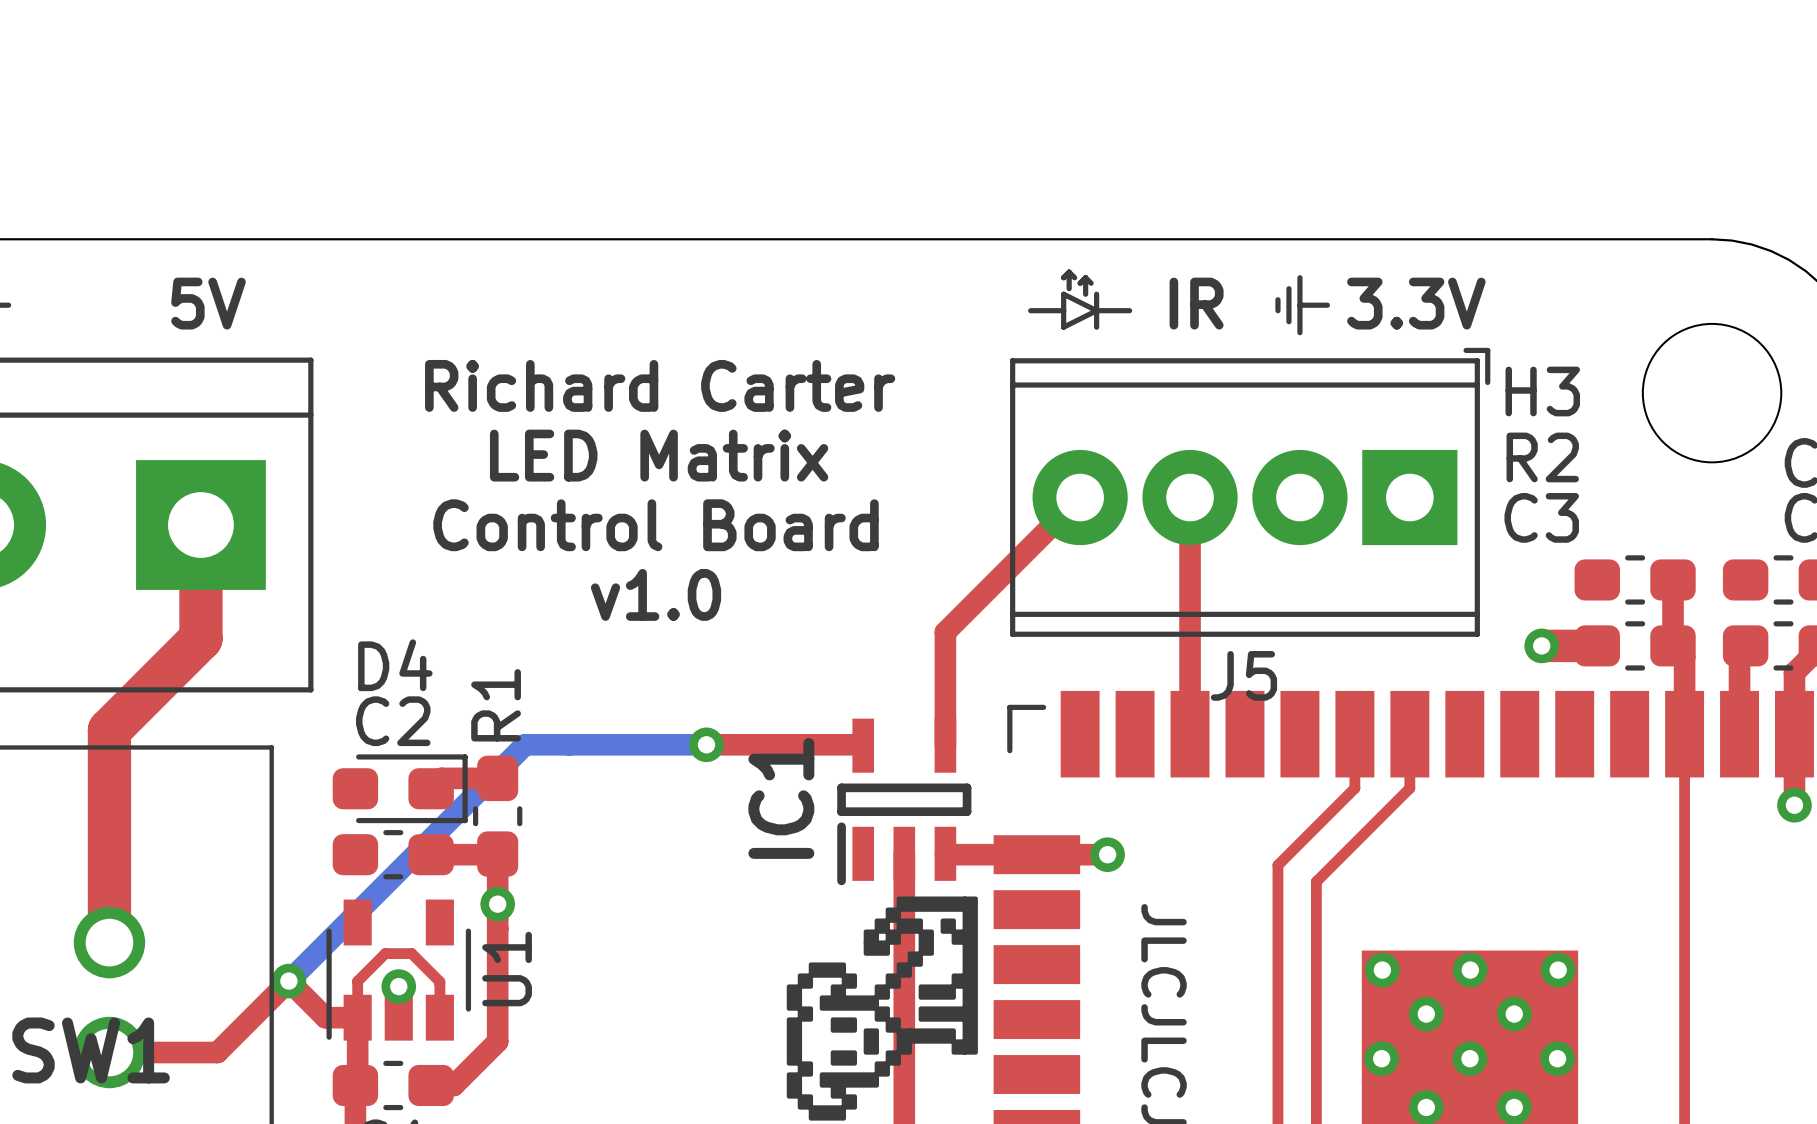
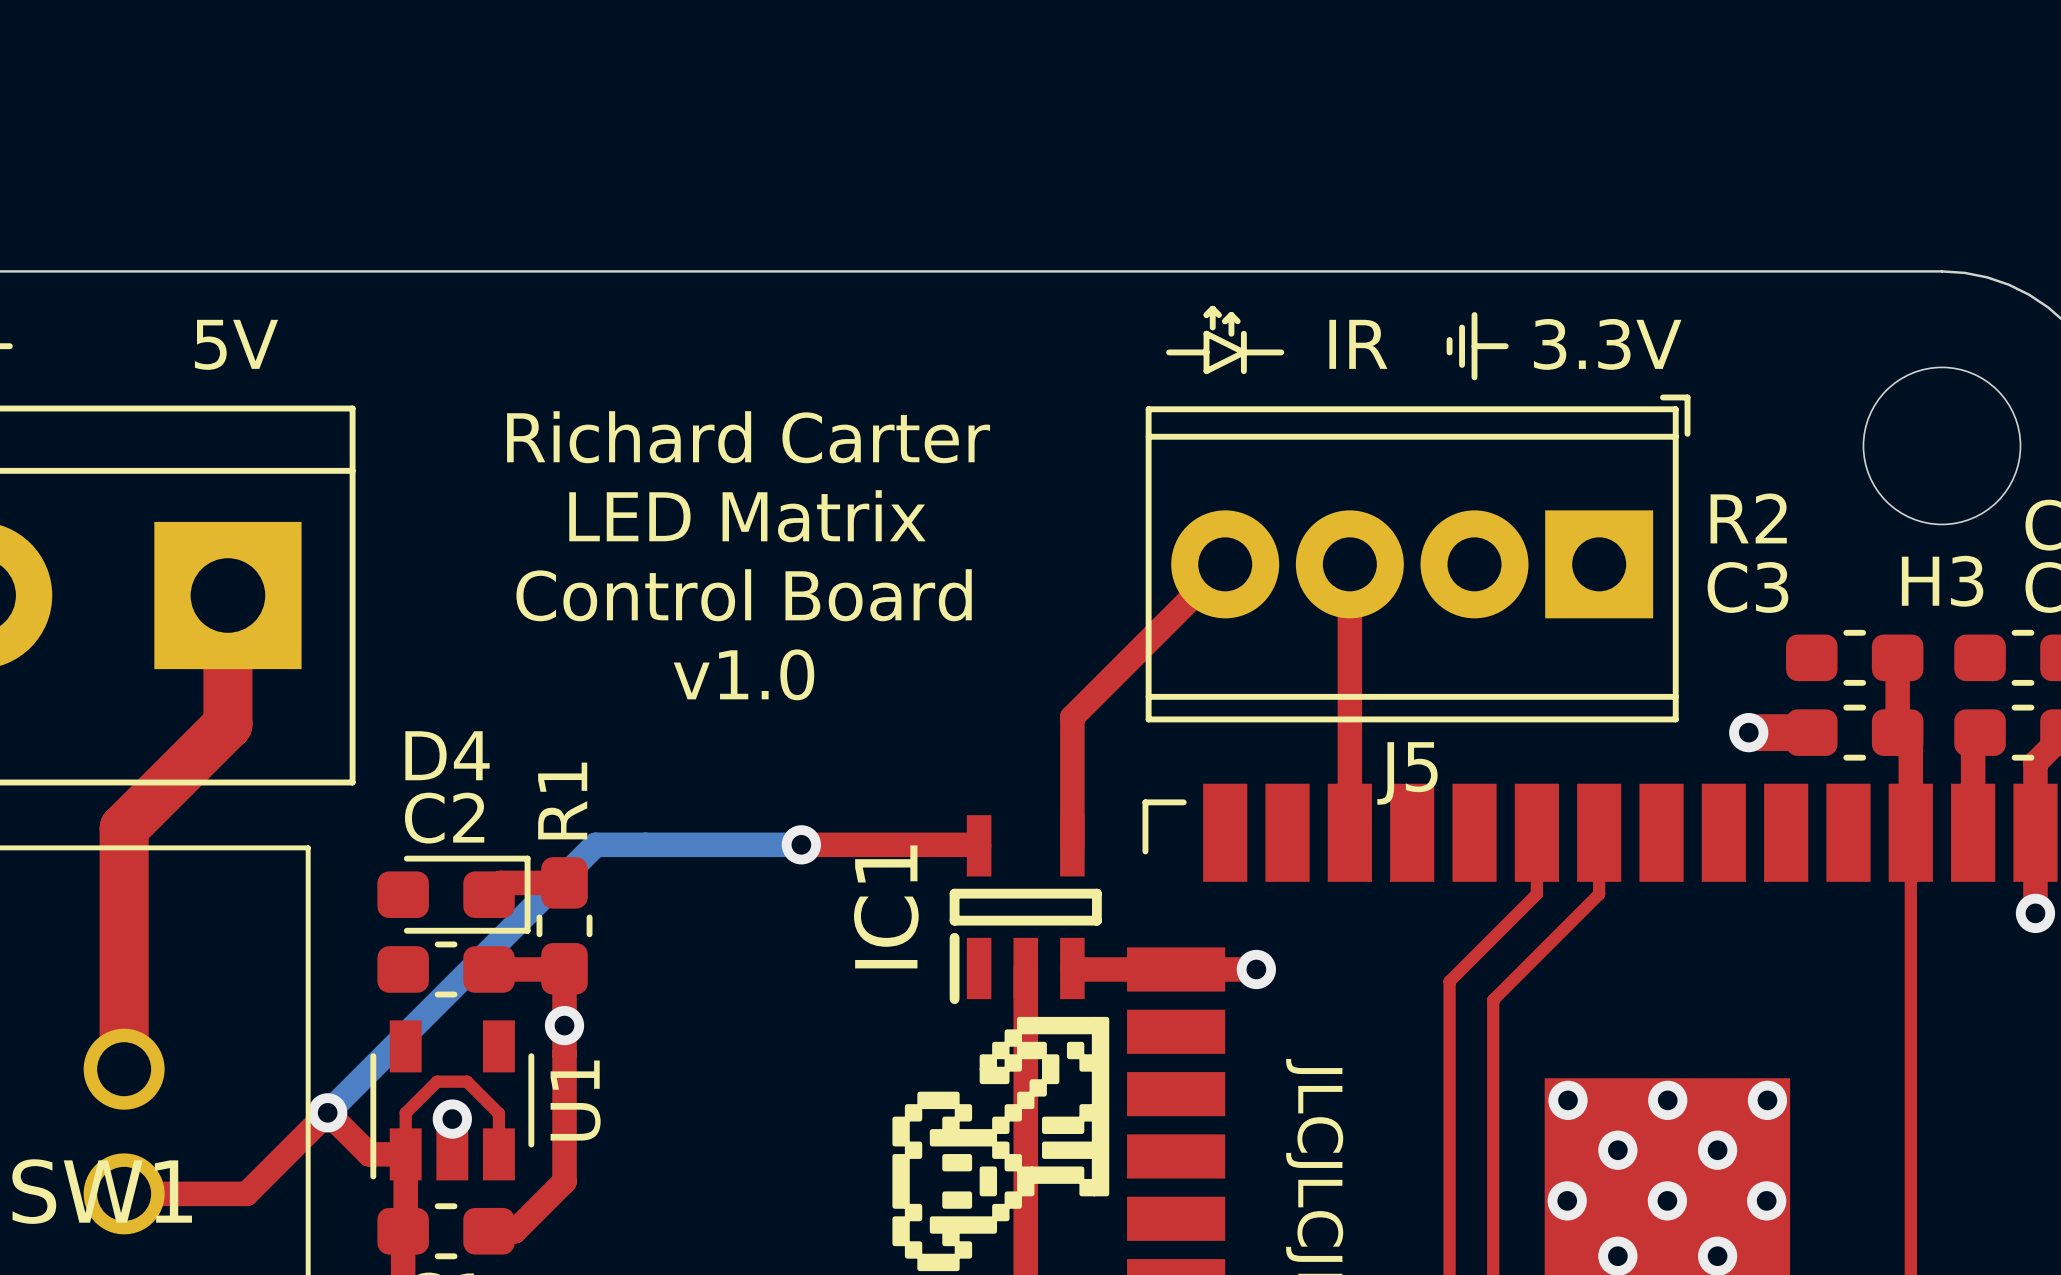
H3 name position: H3 (1542, 391) -> H3 (1942, 581)

